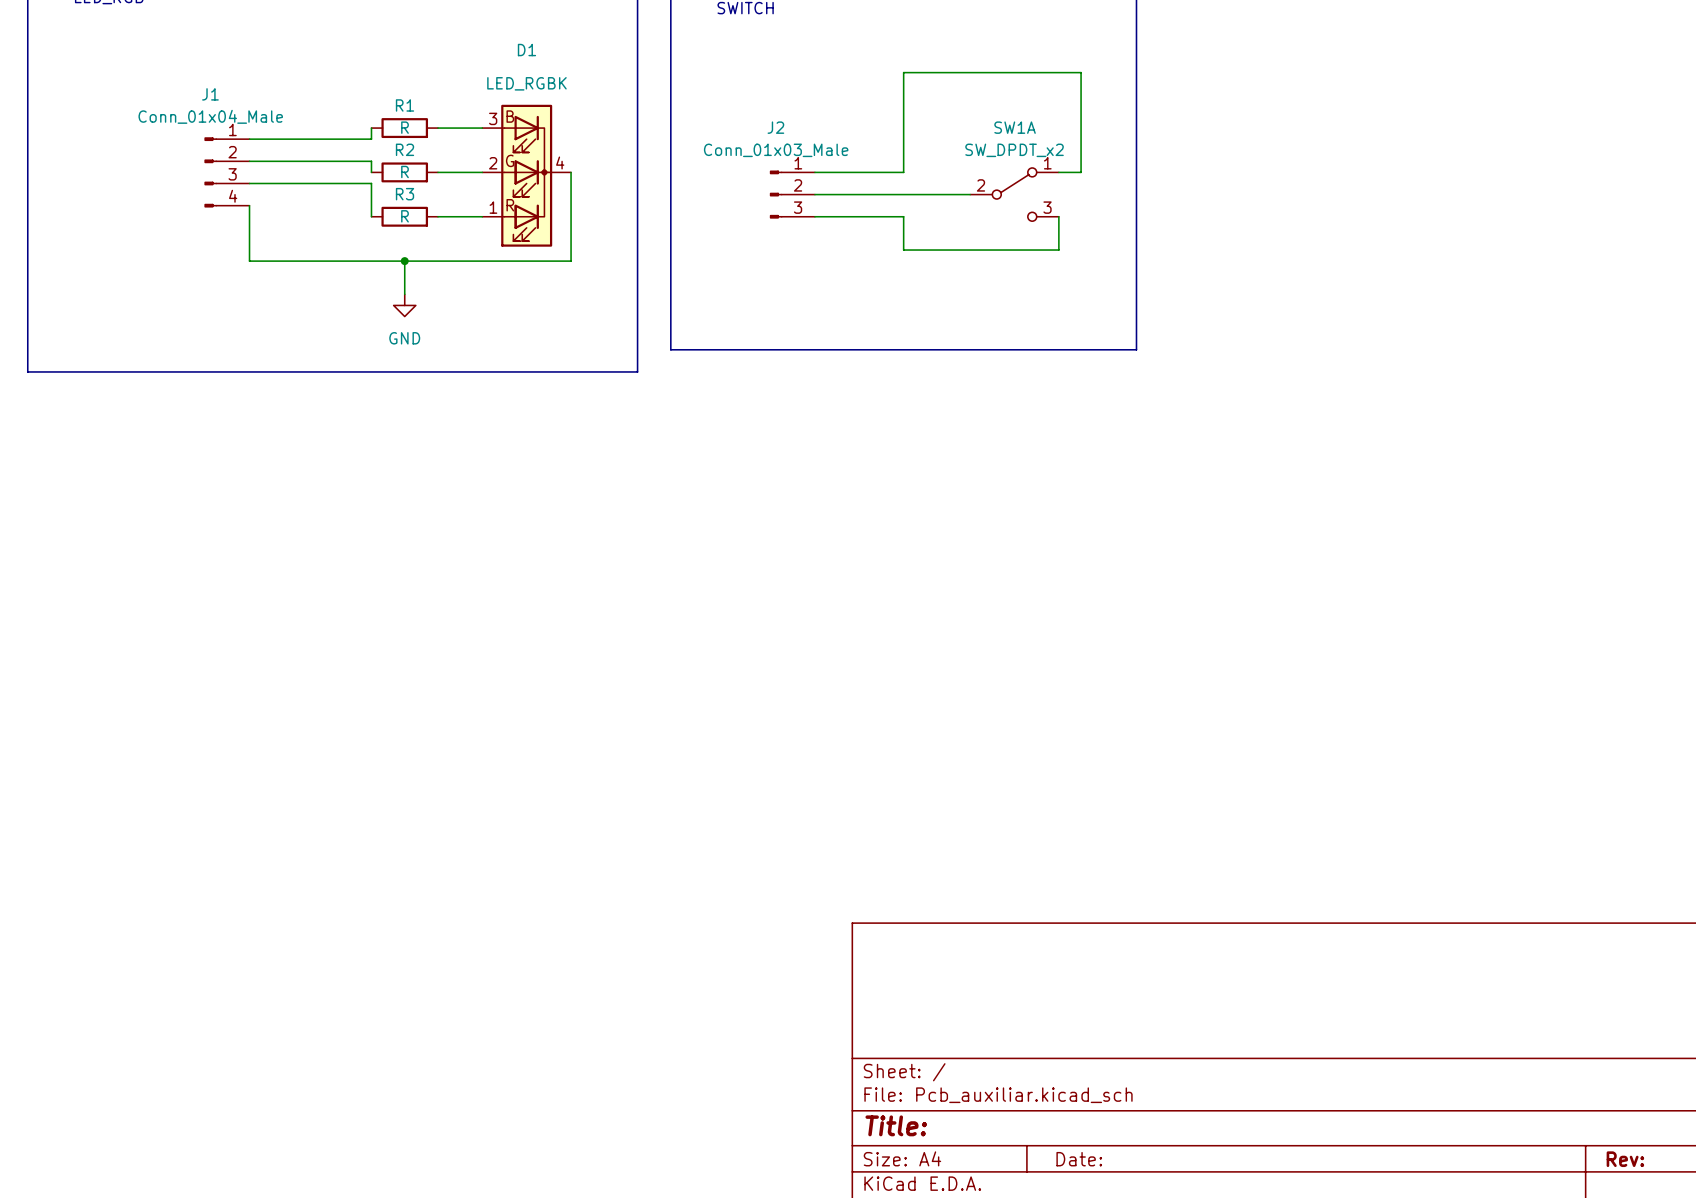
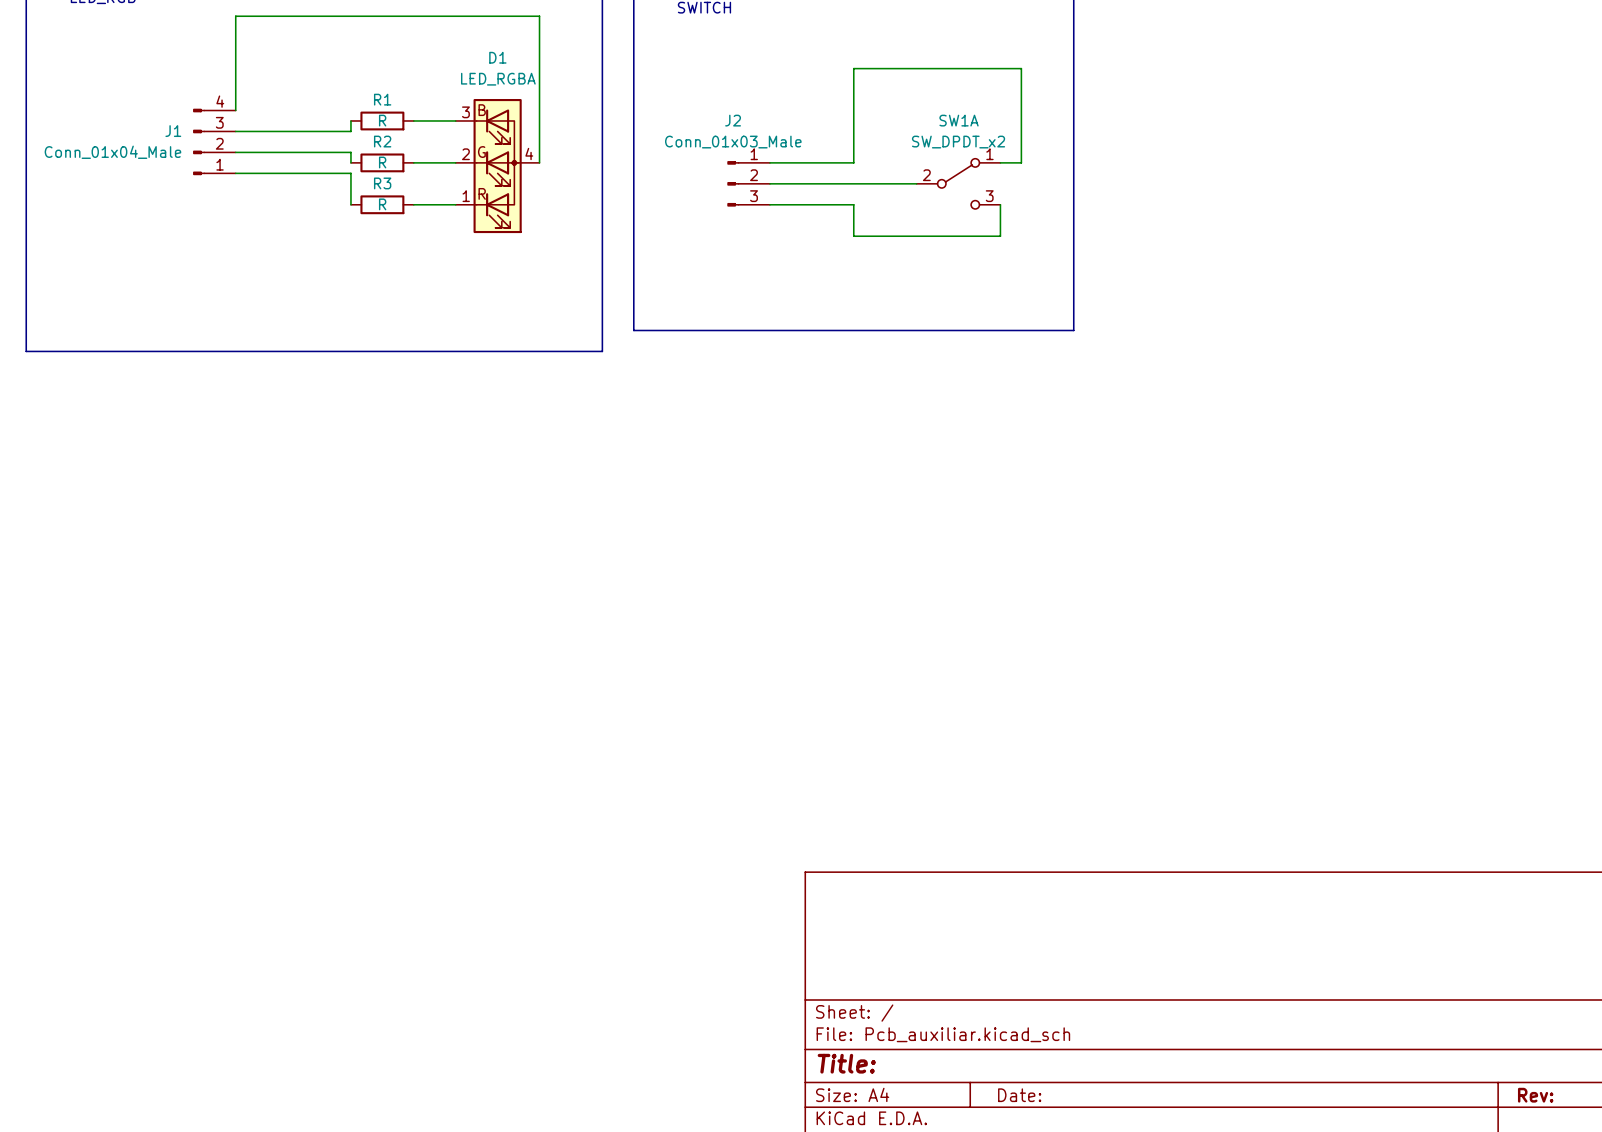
D1 value: LED_RGBK (526, 83) -> LED_RGBA (498, 79)
J1 name position: J1 (210, 94) -> J1 (173, 131)
D1 symbol: [482, 104, 572, 247] -> [455, 98, 540, 234]
J1 value position: Conn_01x04_Male (210, 116) -> Conn_01x04_Male (112, 152)
J1 flip: as is (210, 172) -> up-down (199, 141)
wire: (571, 172) (571, 261) (249, 261) (249, 205) -> (539, 162) (539, 16) (235, 16) (235, 110)
wire: (404, 261) (404, 294) -> none
junction: (404, 261) -> none
power symbol: GND (404, 305) -> none

